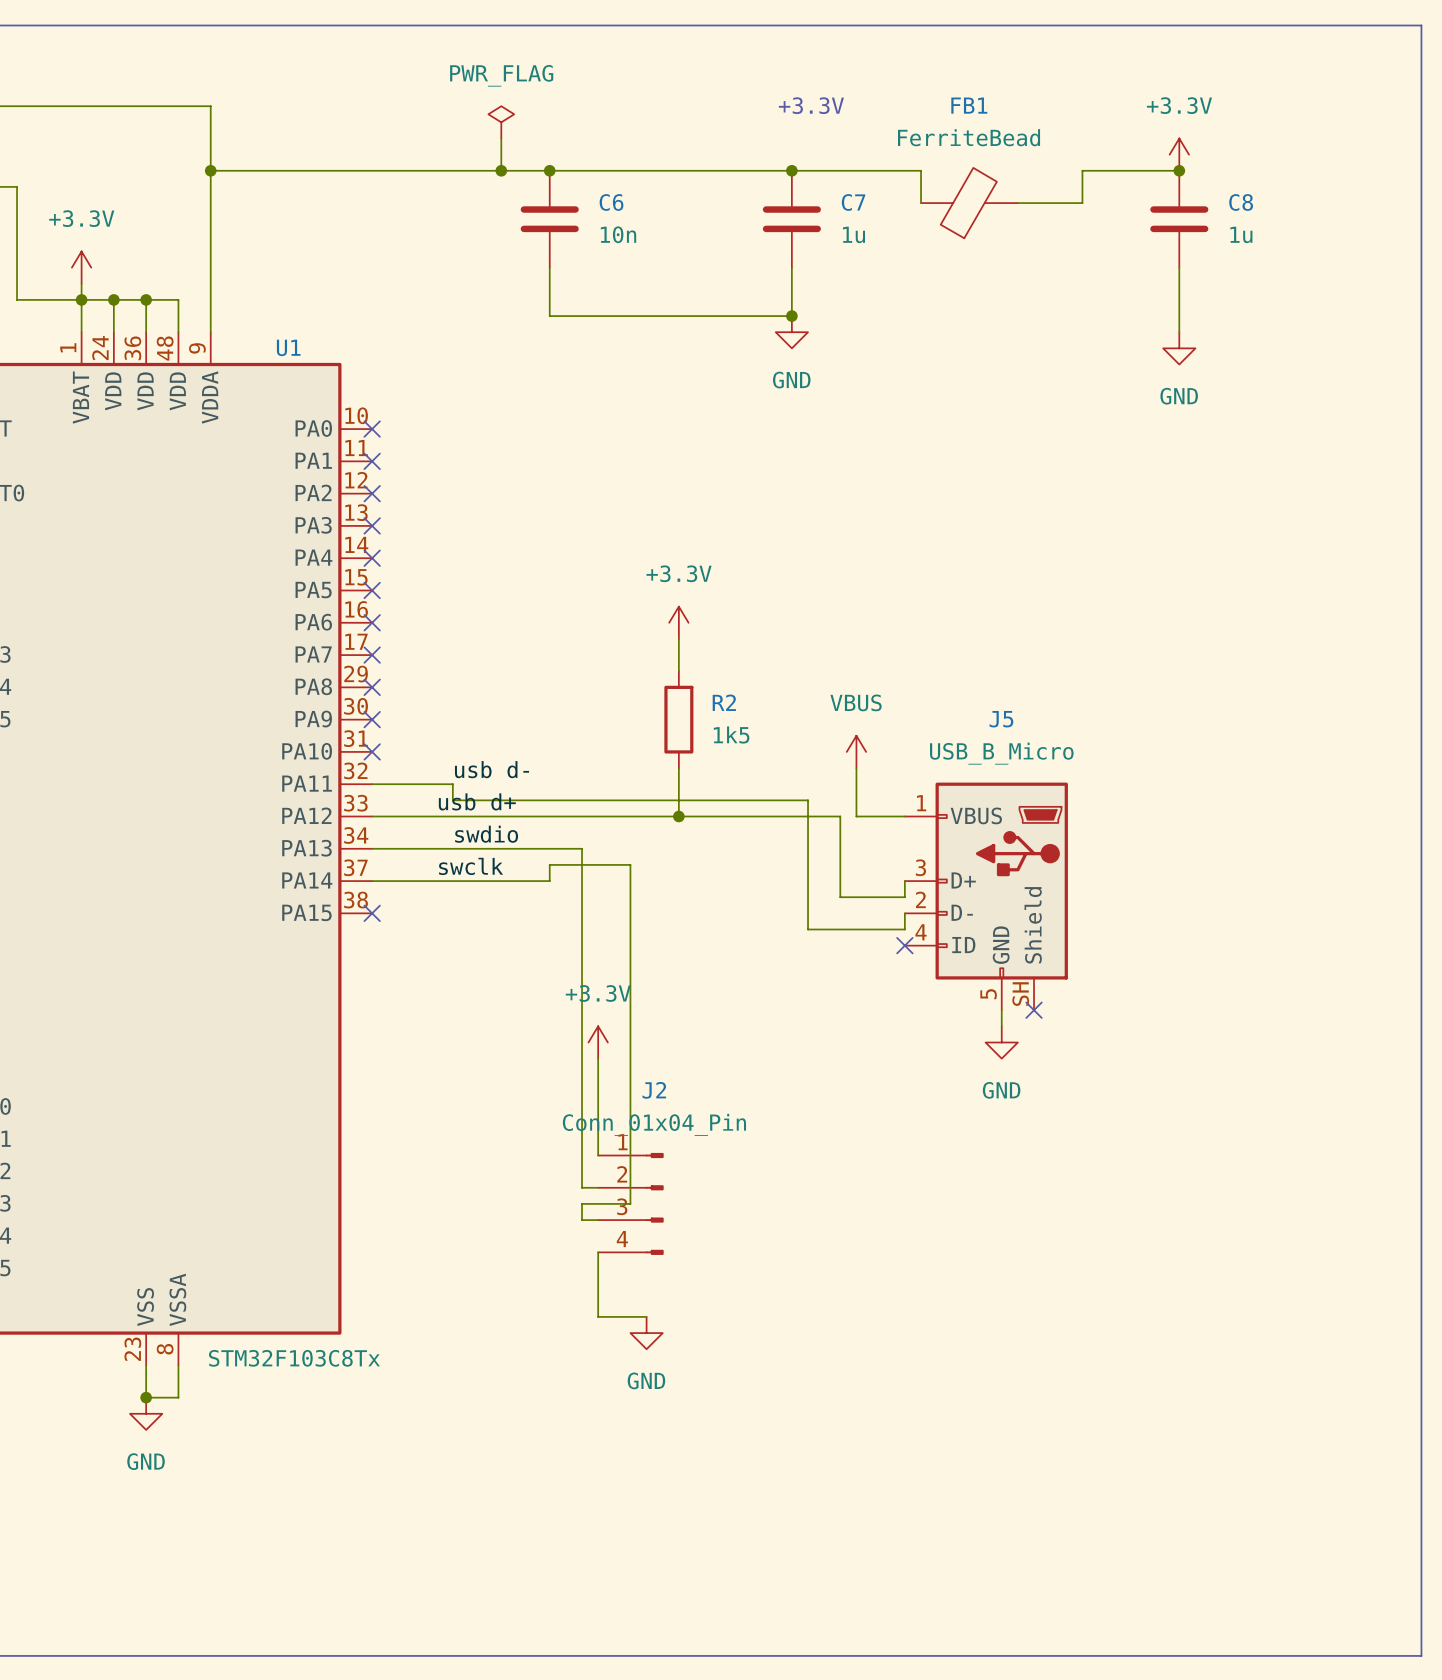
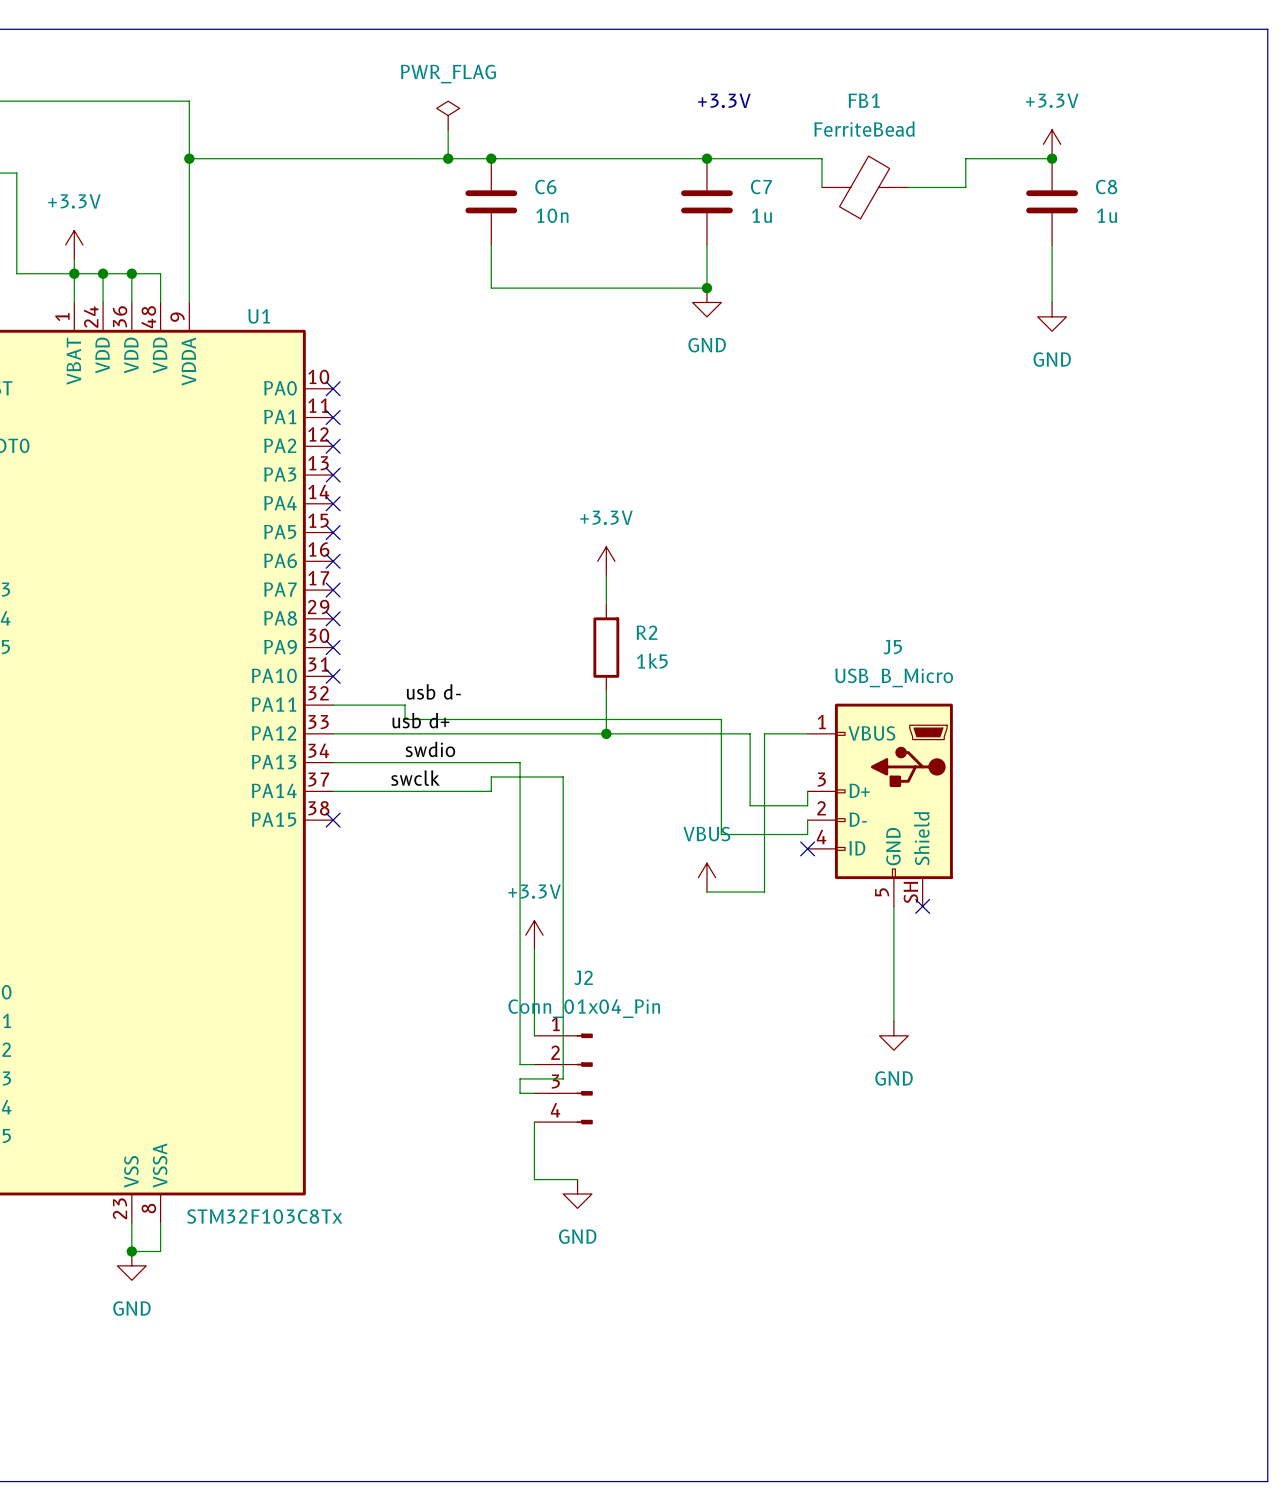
power symbol position: VBUS (856, 751) -> VBUS (706, 877)
wire: (856, 768) (856, 816) -> (706, 892) (764, 892) (764, 733)
wire: none -> (893, 920) (893, 1021)
power symbol position: GND (1001, 1042) -> GND (893, 1035)

